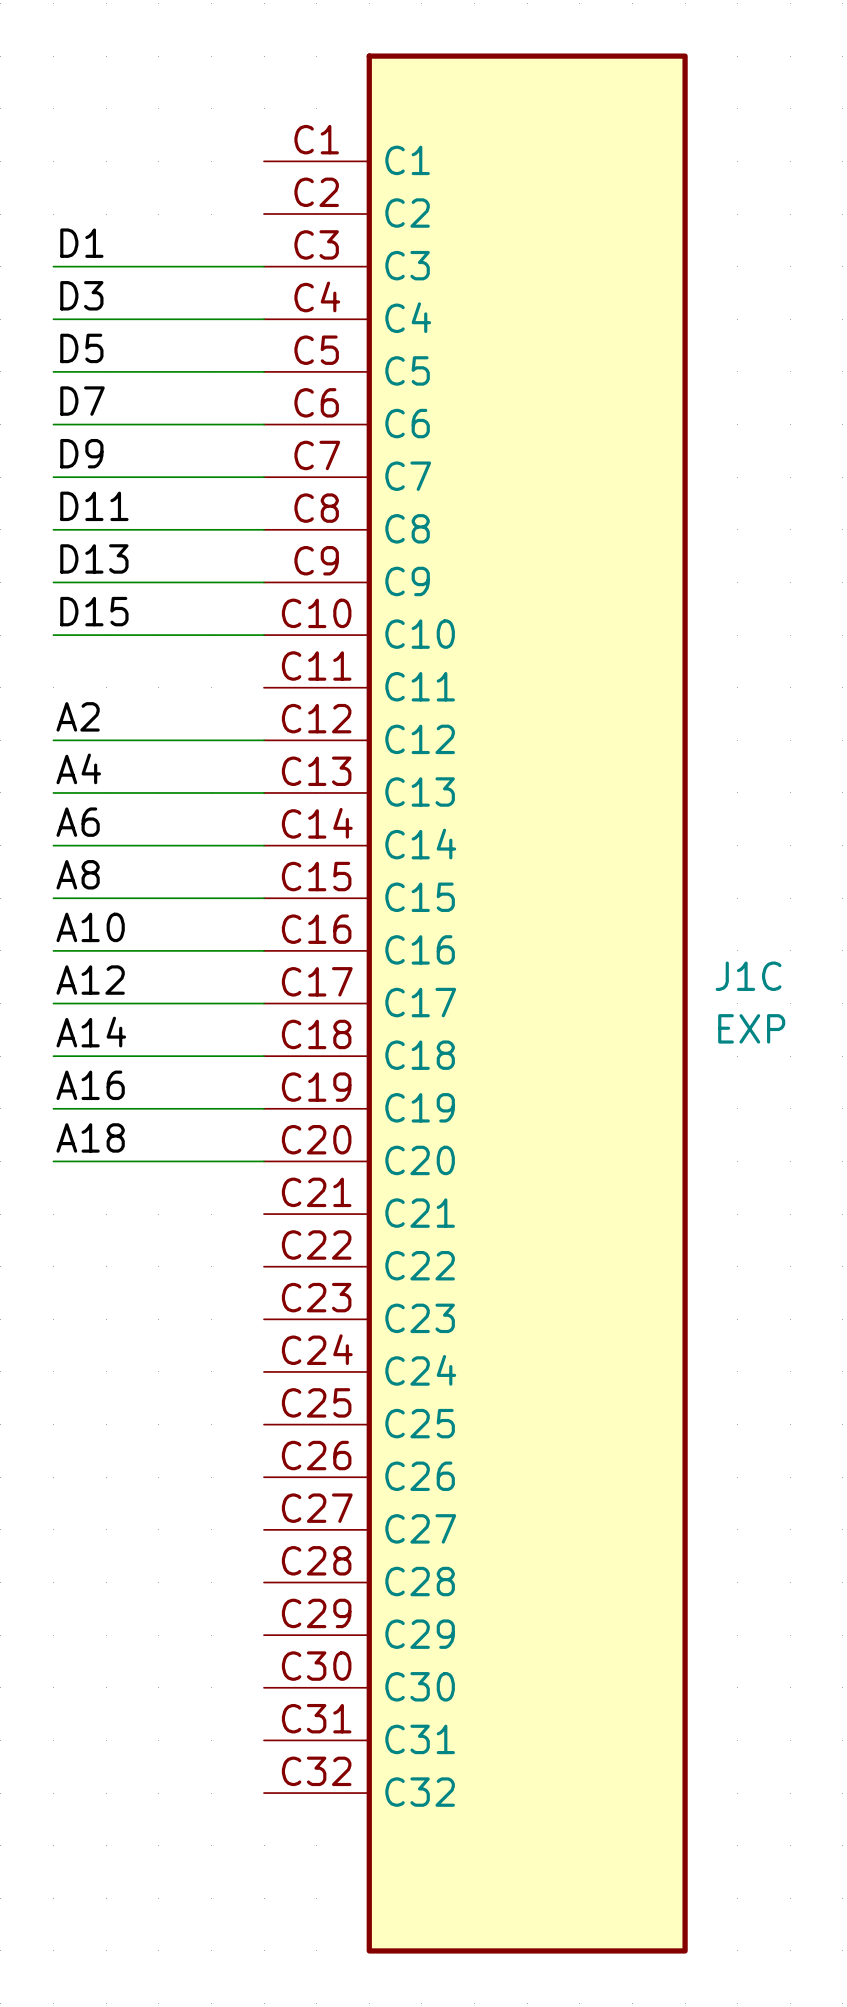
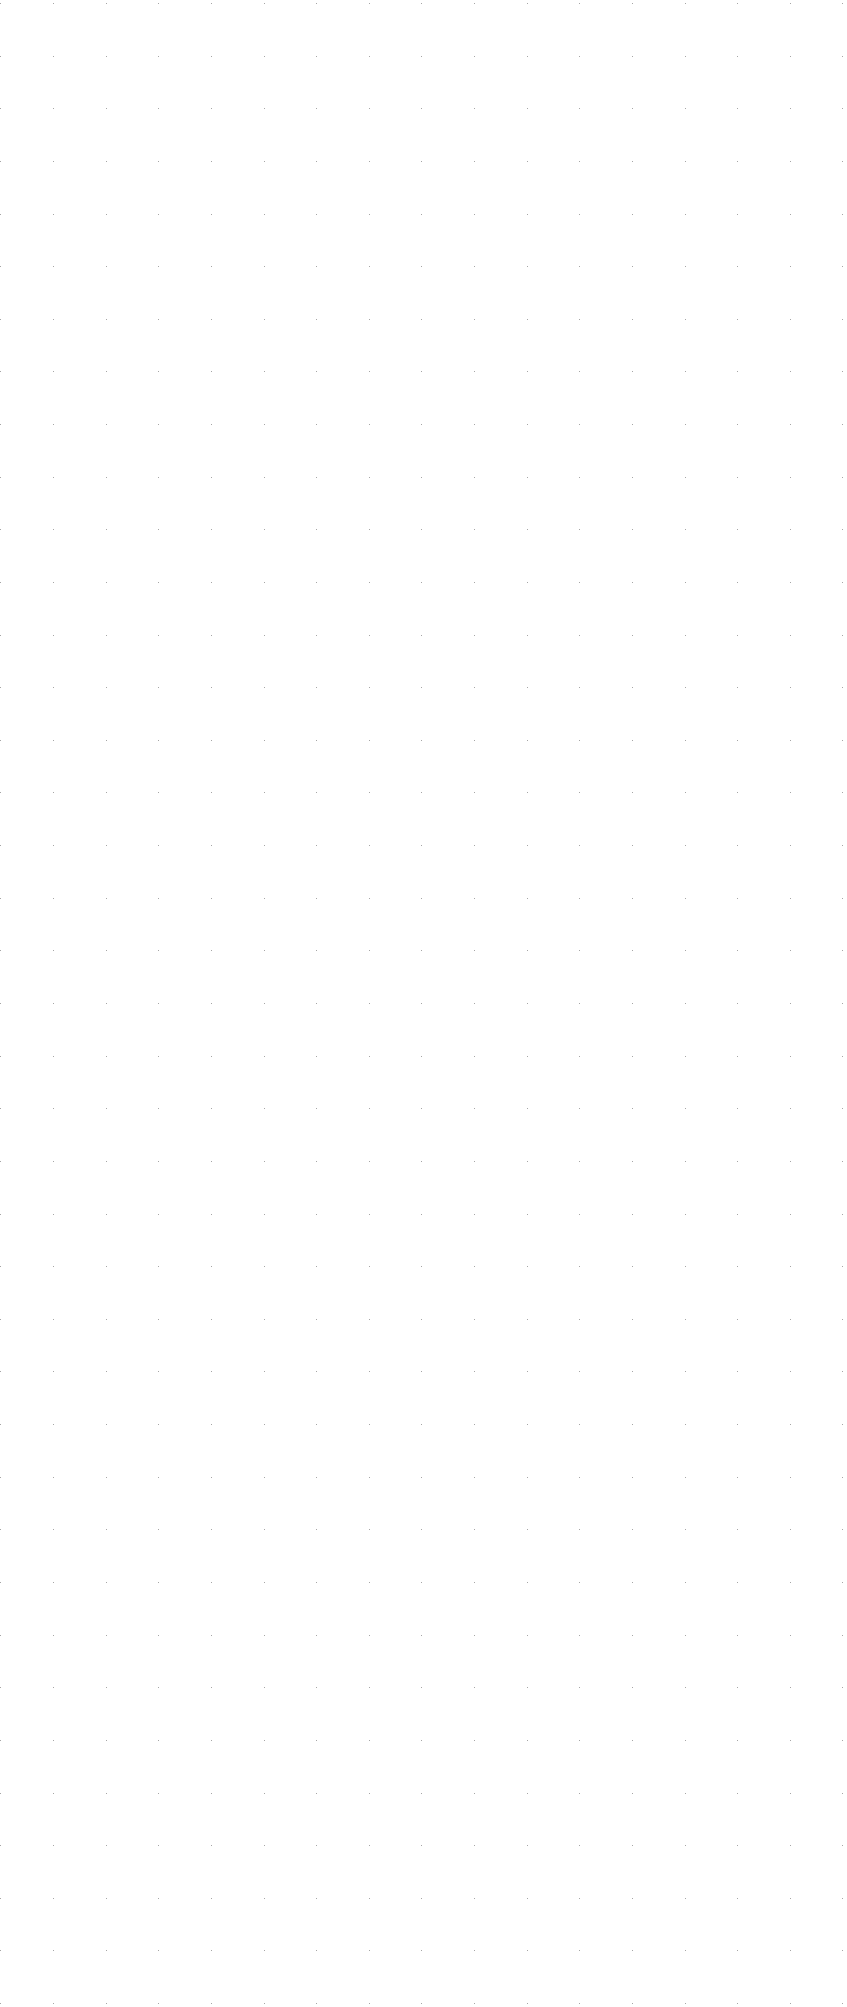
label: D1 (81, 243) -> none
wire: (53, 266) (264, 266) -> none
label: D3 (81, 295) -> none
wire: (53, 319) (264, 319) -> none
label: D5 (81, 348) -> none
wire: (53, 371) (264, 371) -> none
label: D7 (82, 401) -> none
wire: (53, 424) (264, 424) -> none
label: D9 (81, 453) -> none
wire: (53, 477) (264, 477) -> none
label: D11 (94, 506) -> none
wire: (53, 529) (264, 529) -> none
label: D13 (94, 558) -> none
wire: (53, 582) (264, 582) -> none
label: D15 (94, 611) -> none
wire: (53, 635) (264, 635) -> none
label: A2 (78, 716) -> none
wire: (53, 740) (264, 740) -> none
label: A4 (78, 768) -> none
wire: (53, 792) (264, 792) -> none
label: A6 (78, 822) -> none
wire: (53, 845) (264, 845) -> none
label: A8 (78, 874) -> none
wire: (53, 898) (264, 898) -> none
label: A10 (90, 927) -> none
wire: (53, 950) (264, 950) -> none
label: A12 (90, 980) -> none
wire: (53, 1003) (264, 1003) -> none
J1C: EXP (475, 1003) -> none
label: A14 (91, 1032) -> none
wire: (53, 1056) (264, 1056) -> none
label: A16 (90, 1085) -> none
wire: (53, 1108) (264, 1108) -> none
label: A18 (90, 1137) -> none
wire: (53, 1161) (264, 1161) -> none

